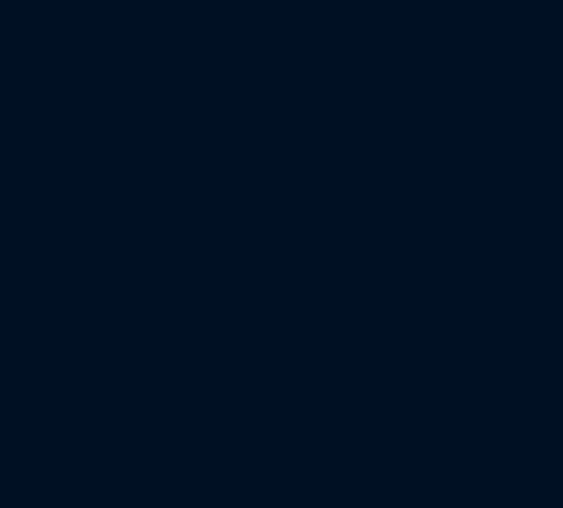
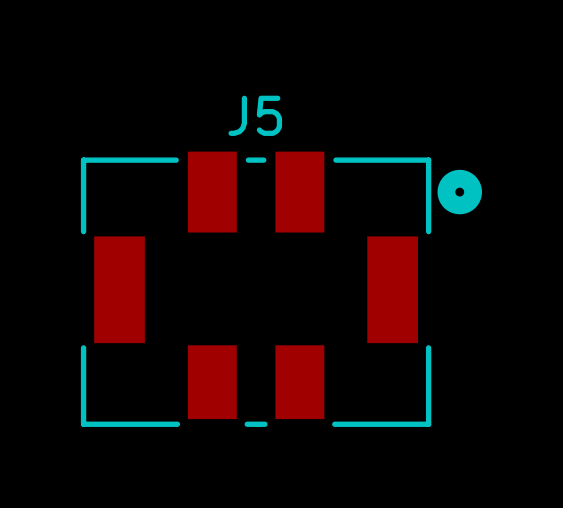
J5: none -> (281, 289)

